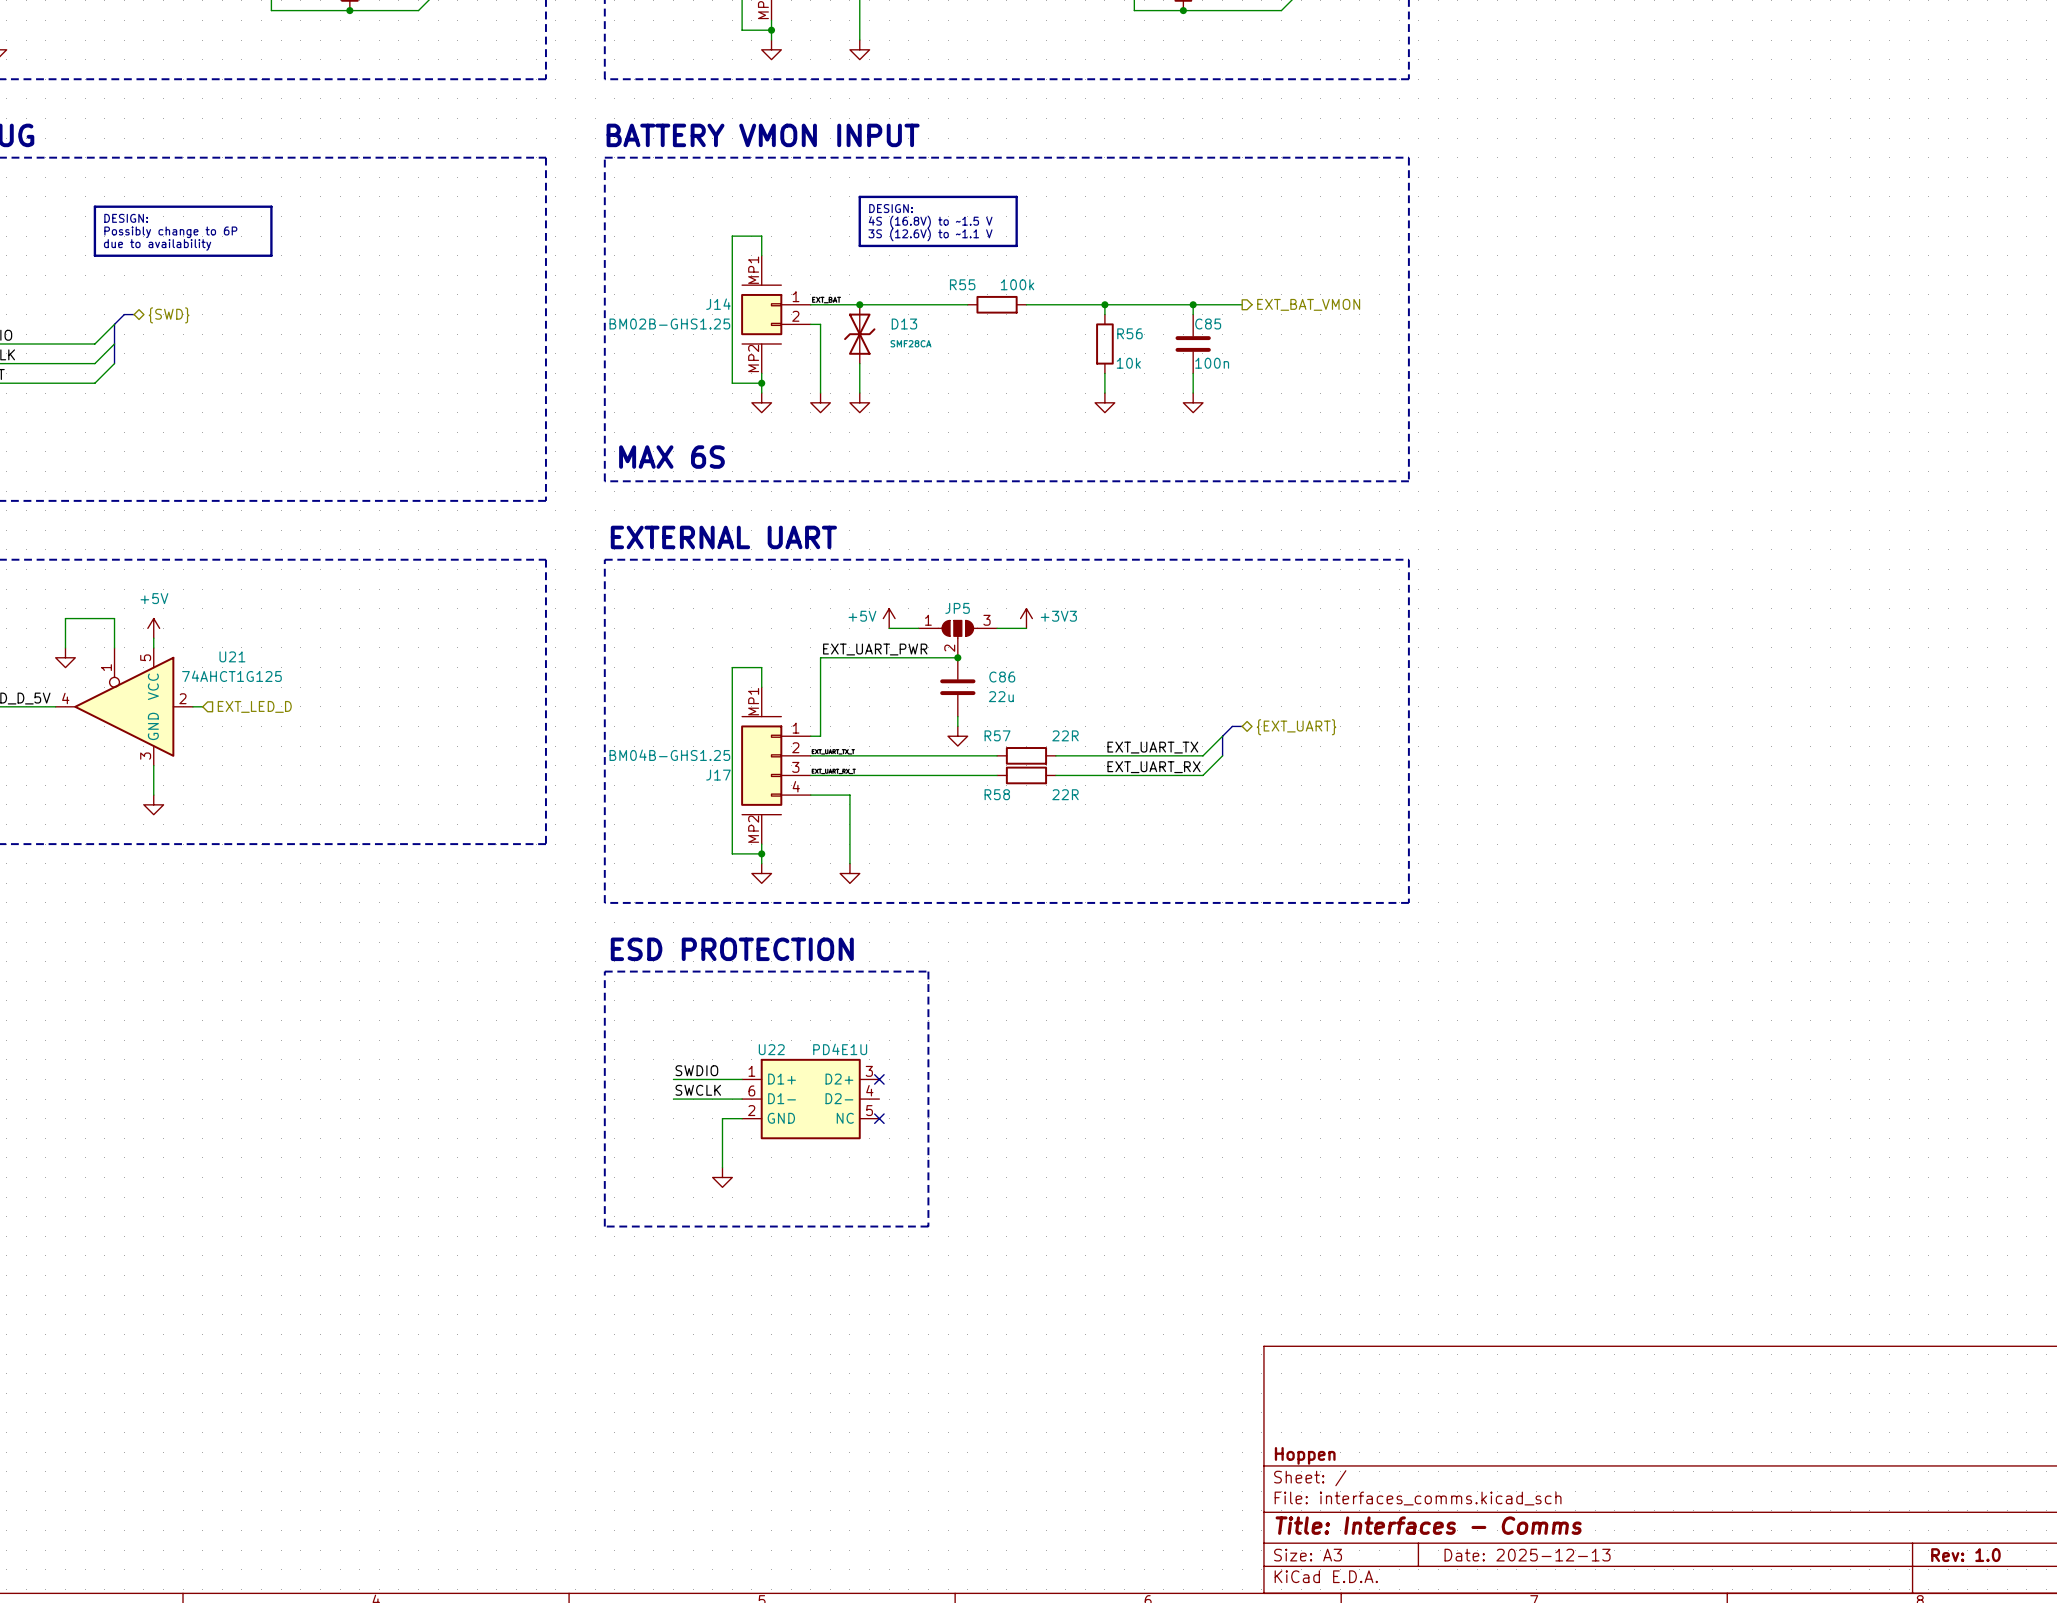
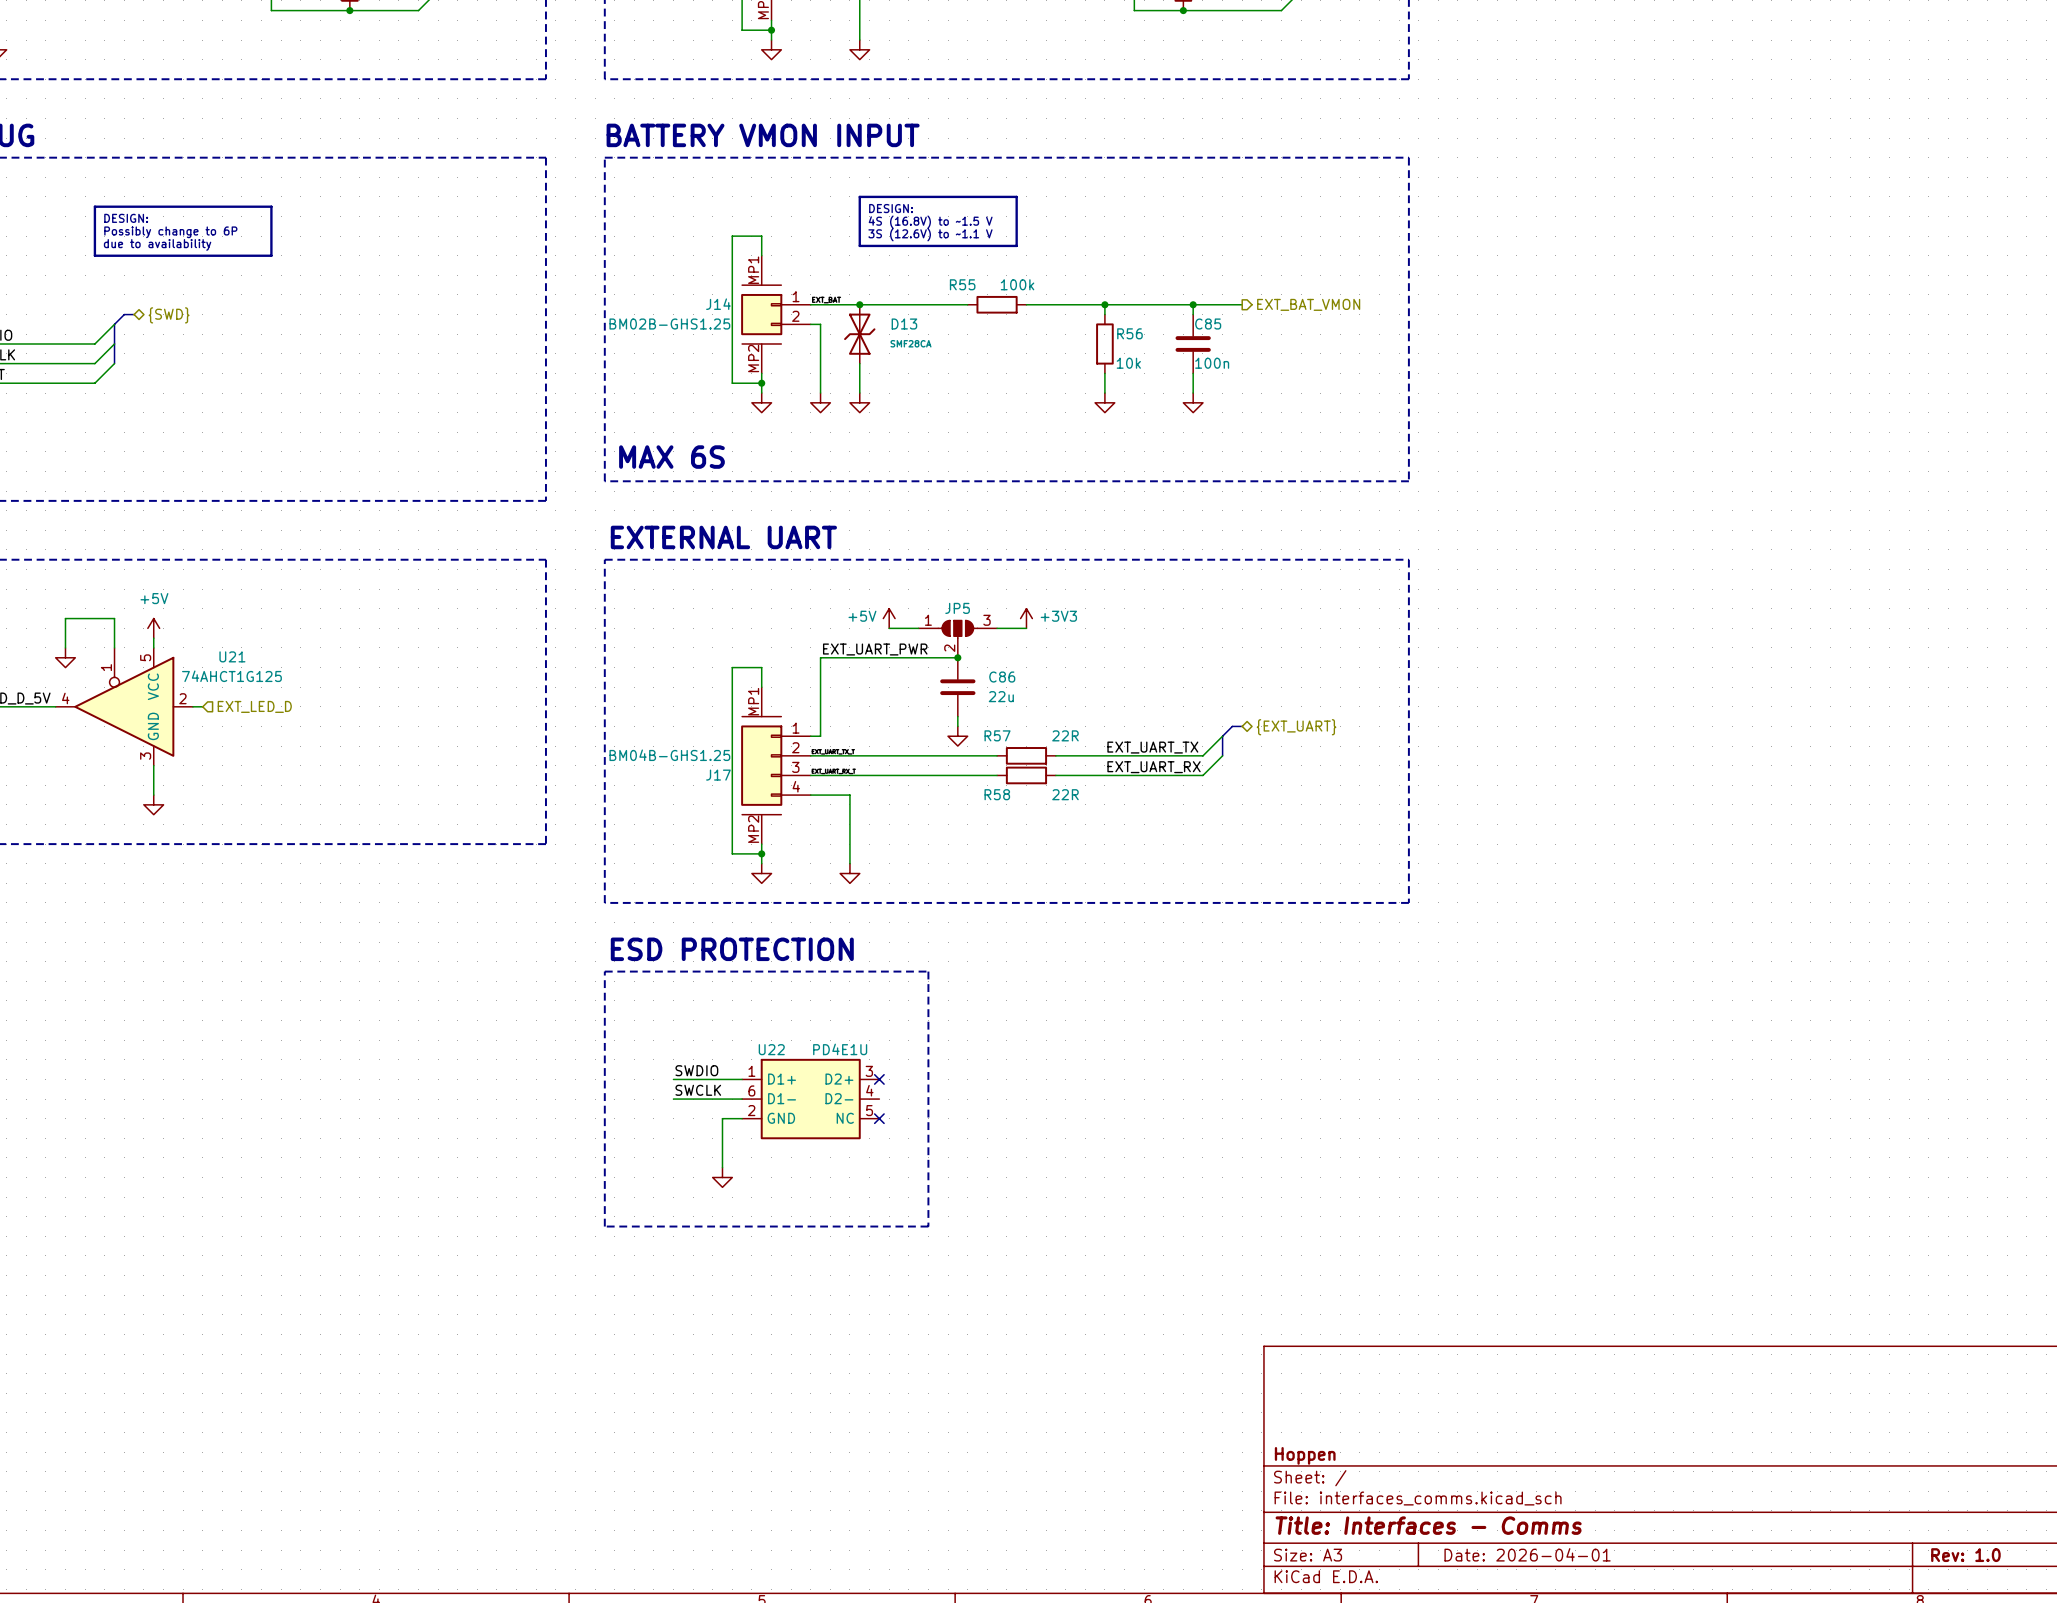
title block: Date: 2025-12-13 (1527, 1555) -> Date: 2026-04-01 (1527, 1554)

